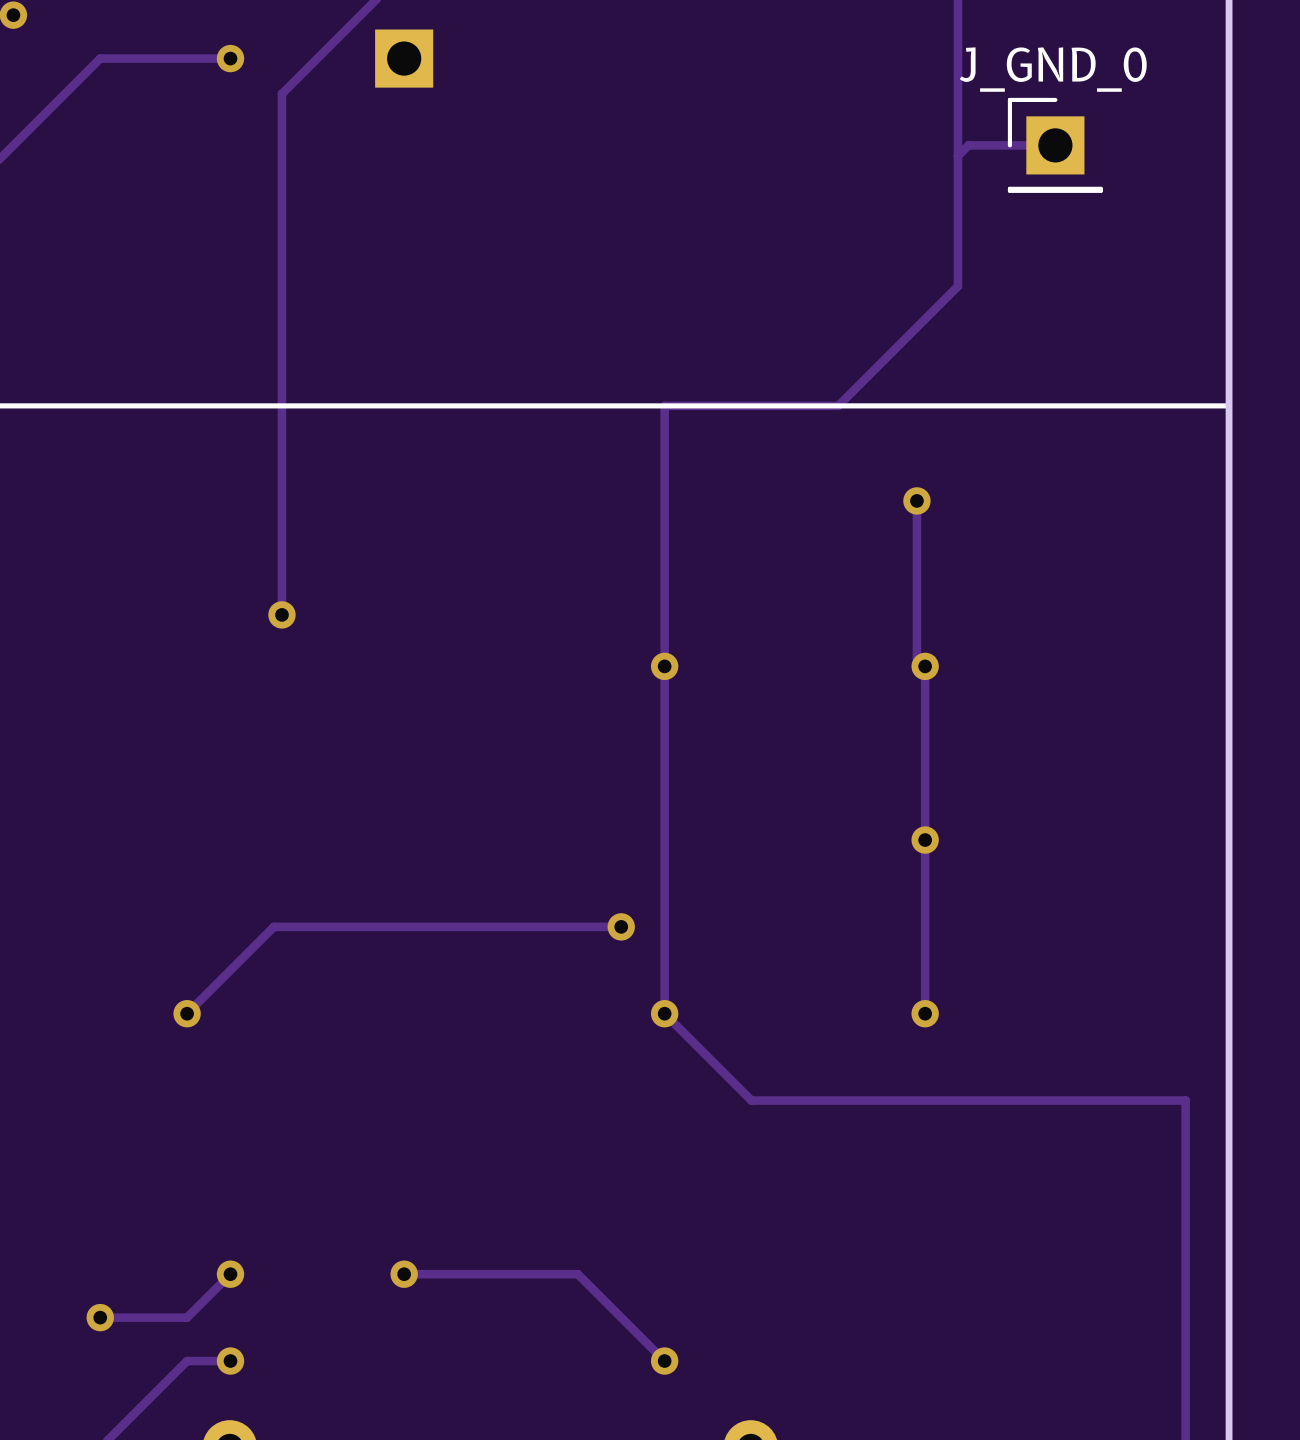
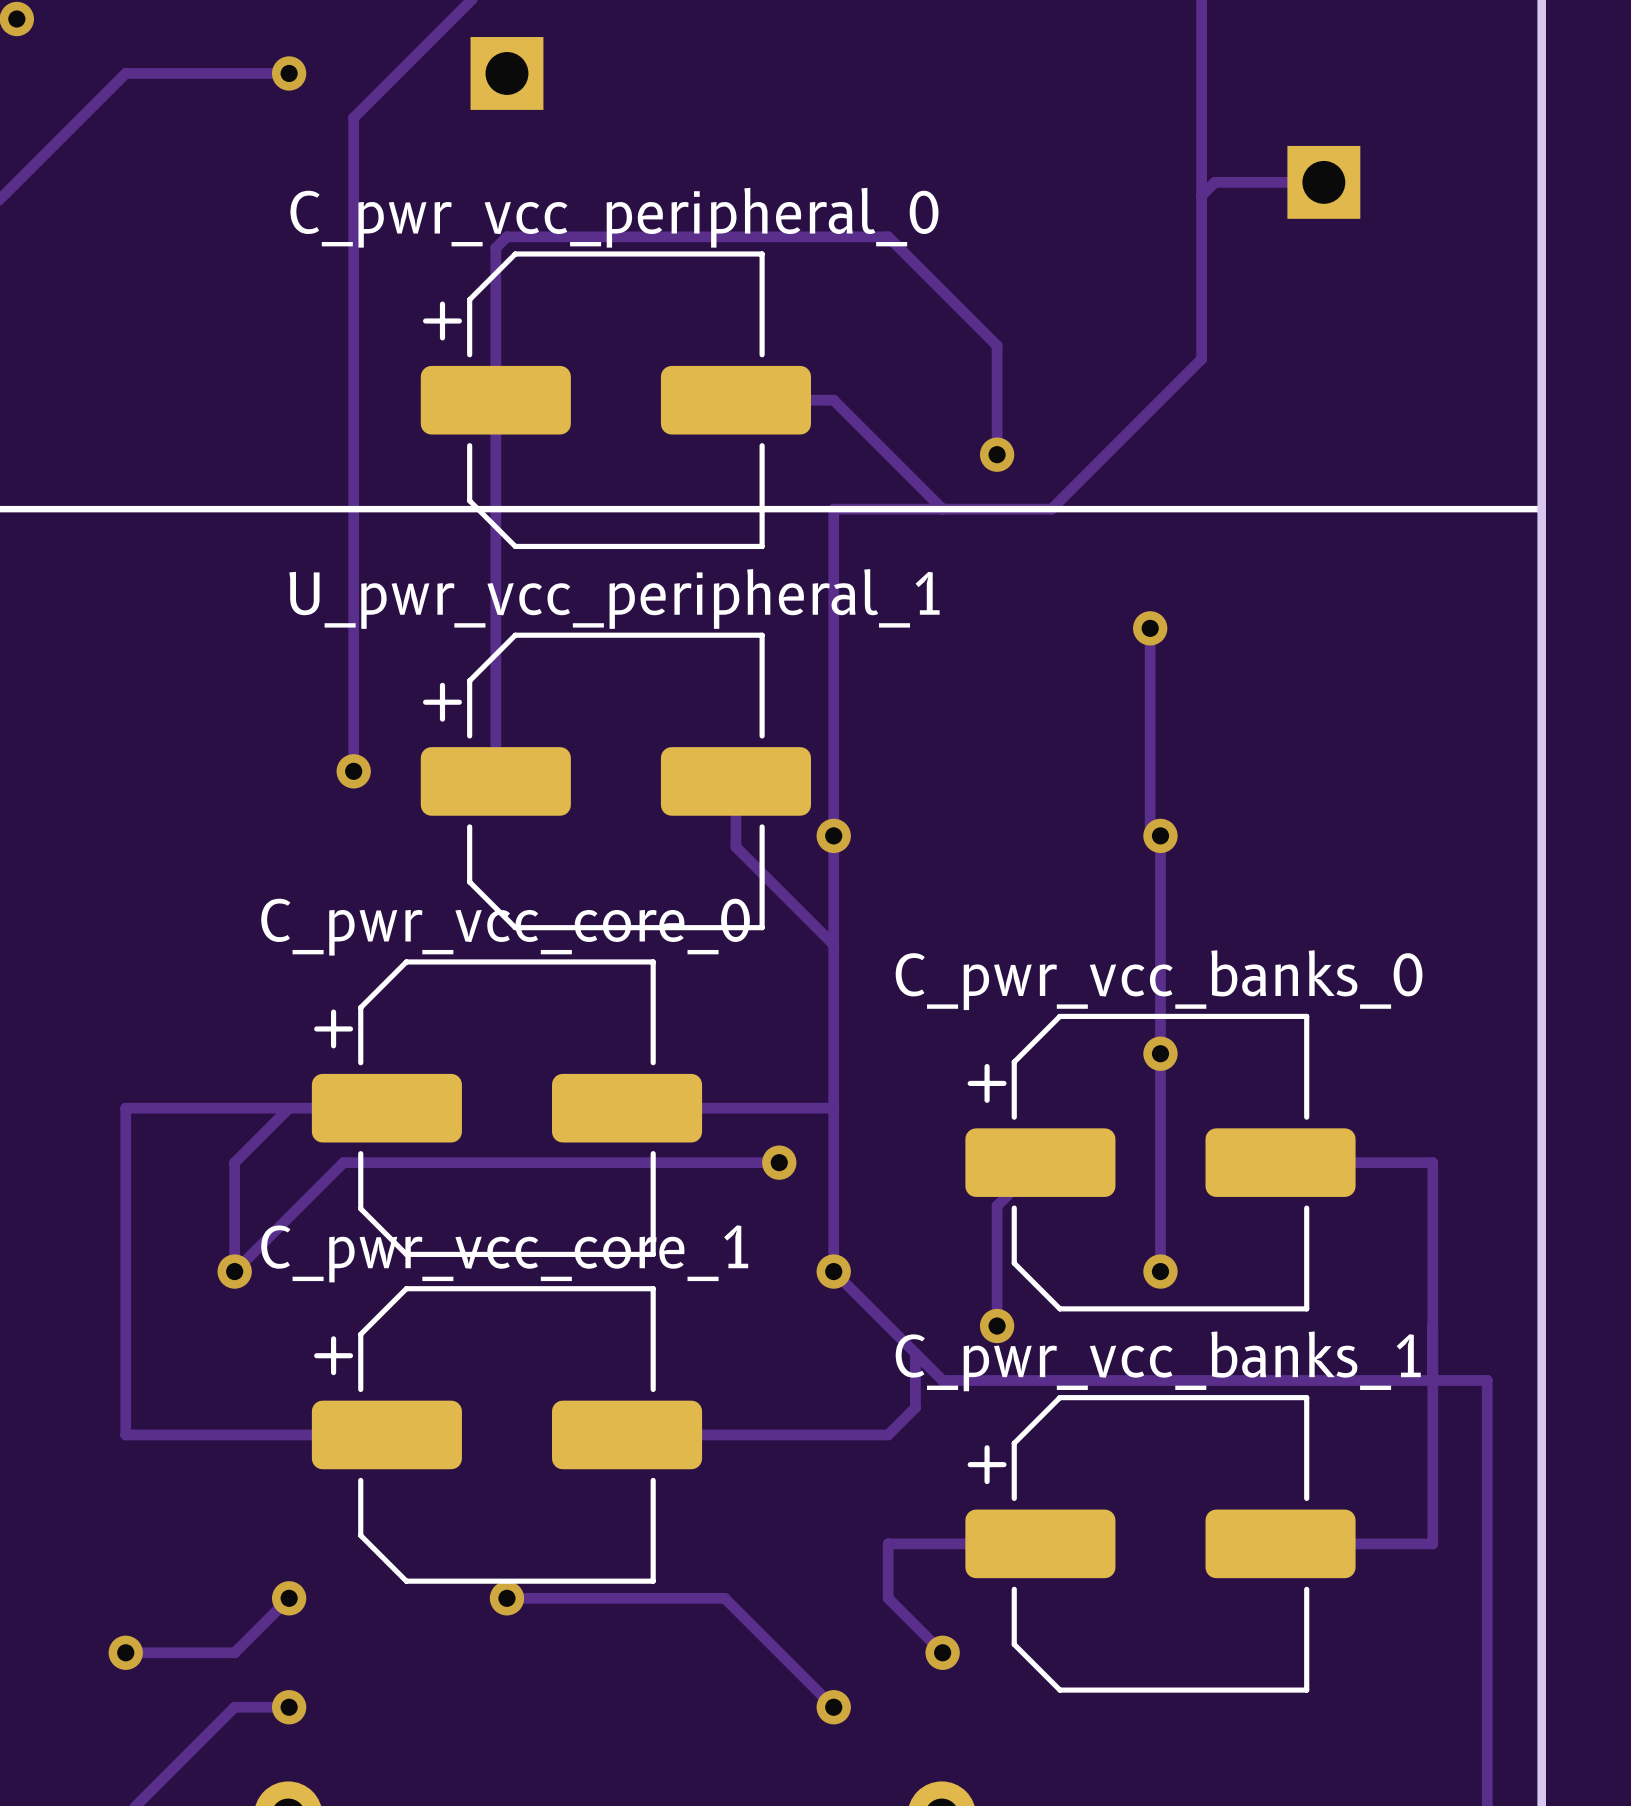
J_GND_0 side: top (1055, 145) -> bottom (1323, 182)
C_pwr_vcc_peripheral_0: none -> (615, 400)
track: none -> (735, 400) (833, 400) (942, 509)
track: none -> (997, 454) (997, 345) (888, 236) (506, 236) (495, 247) (495, 781)
via: none -> (997, 454)
U_pwr_vcc_peripheral_1: none -> (615, 781)
track: none -> (735, 781) (735, 847) (833, 944)
track: none -> (289, 1108) (234, 1162) (234, 1271)
track: none -> (386, 1108) (125, 1108) (125, 1434) (386, 1434)
C_pwr_vcc_core_0: none -> (506, 1108)
track: none -> (627, 1108) (833, 1108)
track: none -> (1040, 1162) (997, 1205) (997, 1326)
C_pwr_vcc_banks_0: none -> (1160, 1162)
track: none -> (1280, 1162) (1432, 1162) (1432, 1543) (1280, 1543)
via: none -> (997, 1326)
track: none -> (915, 1353) (915, 1407) (888, 1434) (627, 1434)
C_pwr_vcc_core_1: none -> (506, 1434)
track: none -> (1040, 1543) (888, 1543) (888, 1598) (942, 1652)
C_pwr_vcc_banks_1: none -> (1160, 1543)
via: none -> (942, 1652)

